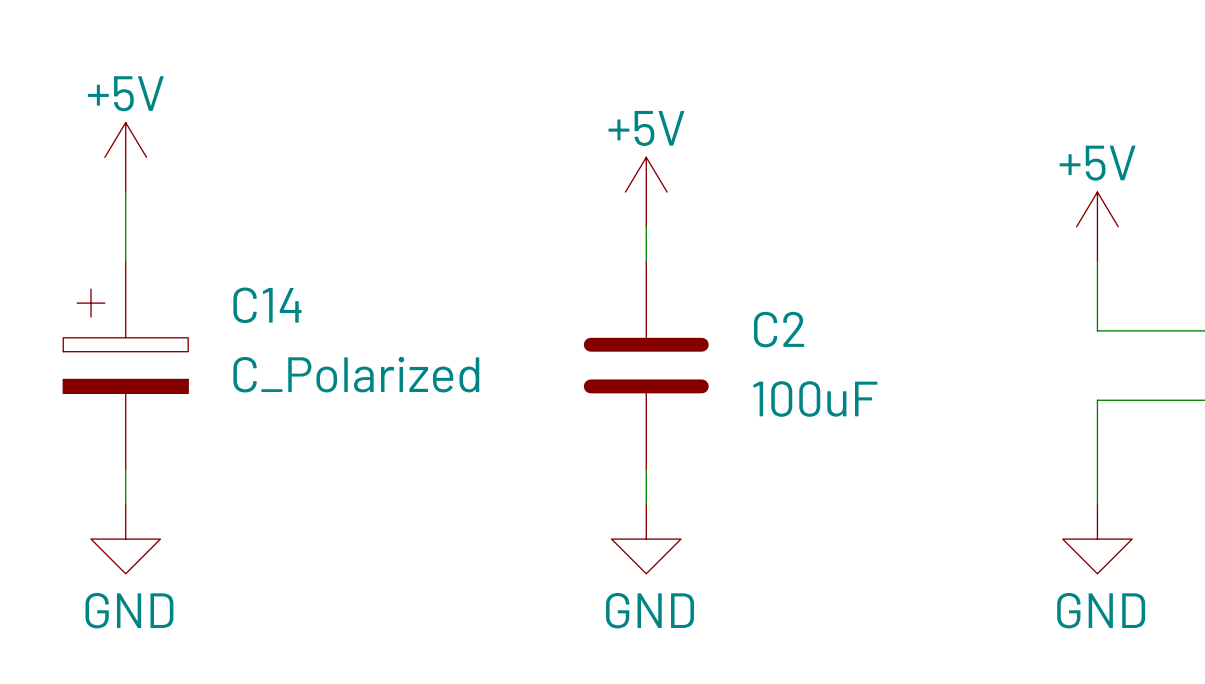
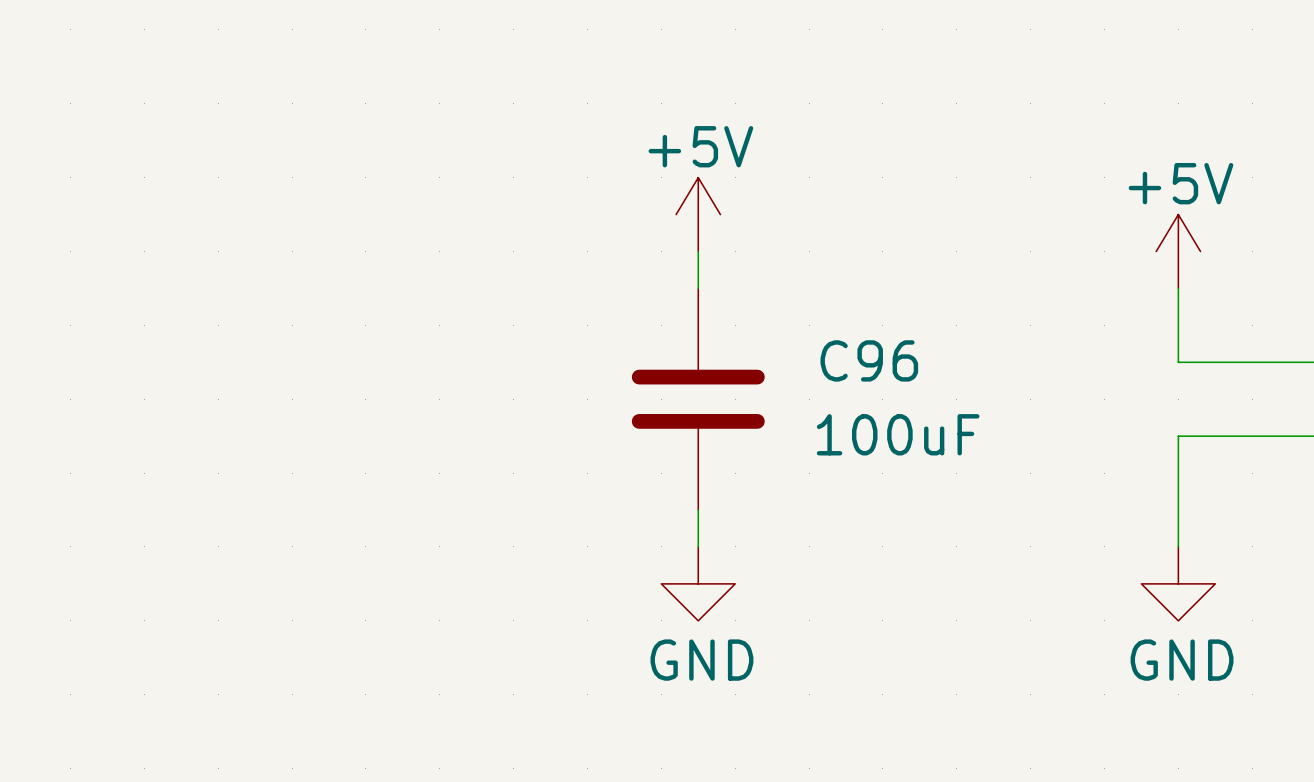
power symbol: +5V (125, 157) -> none
wire: (125, 192) (125, 261) -> none
C2 name: C2 (779, 329) -> C96 (869, 360)
C14: C_Polarized (125, 365) -> none
wire: (125, 469) (125, 504) -> none
power symbol: GND (125, 539) -> none

